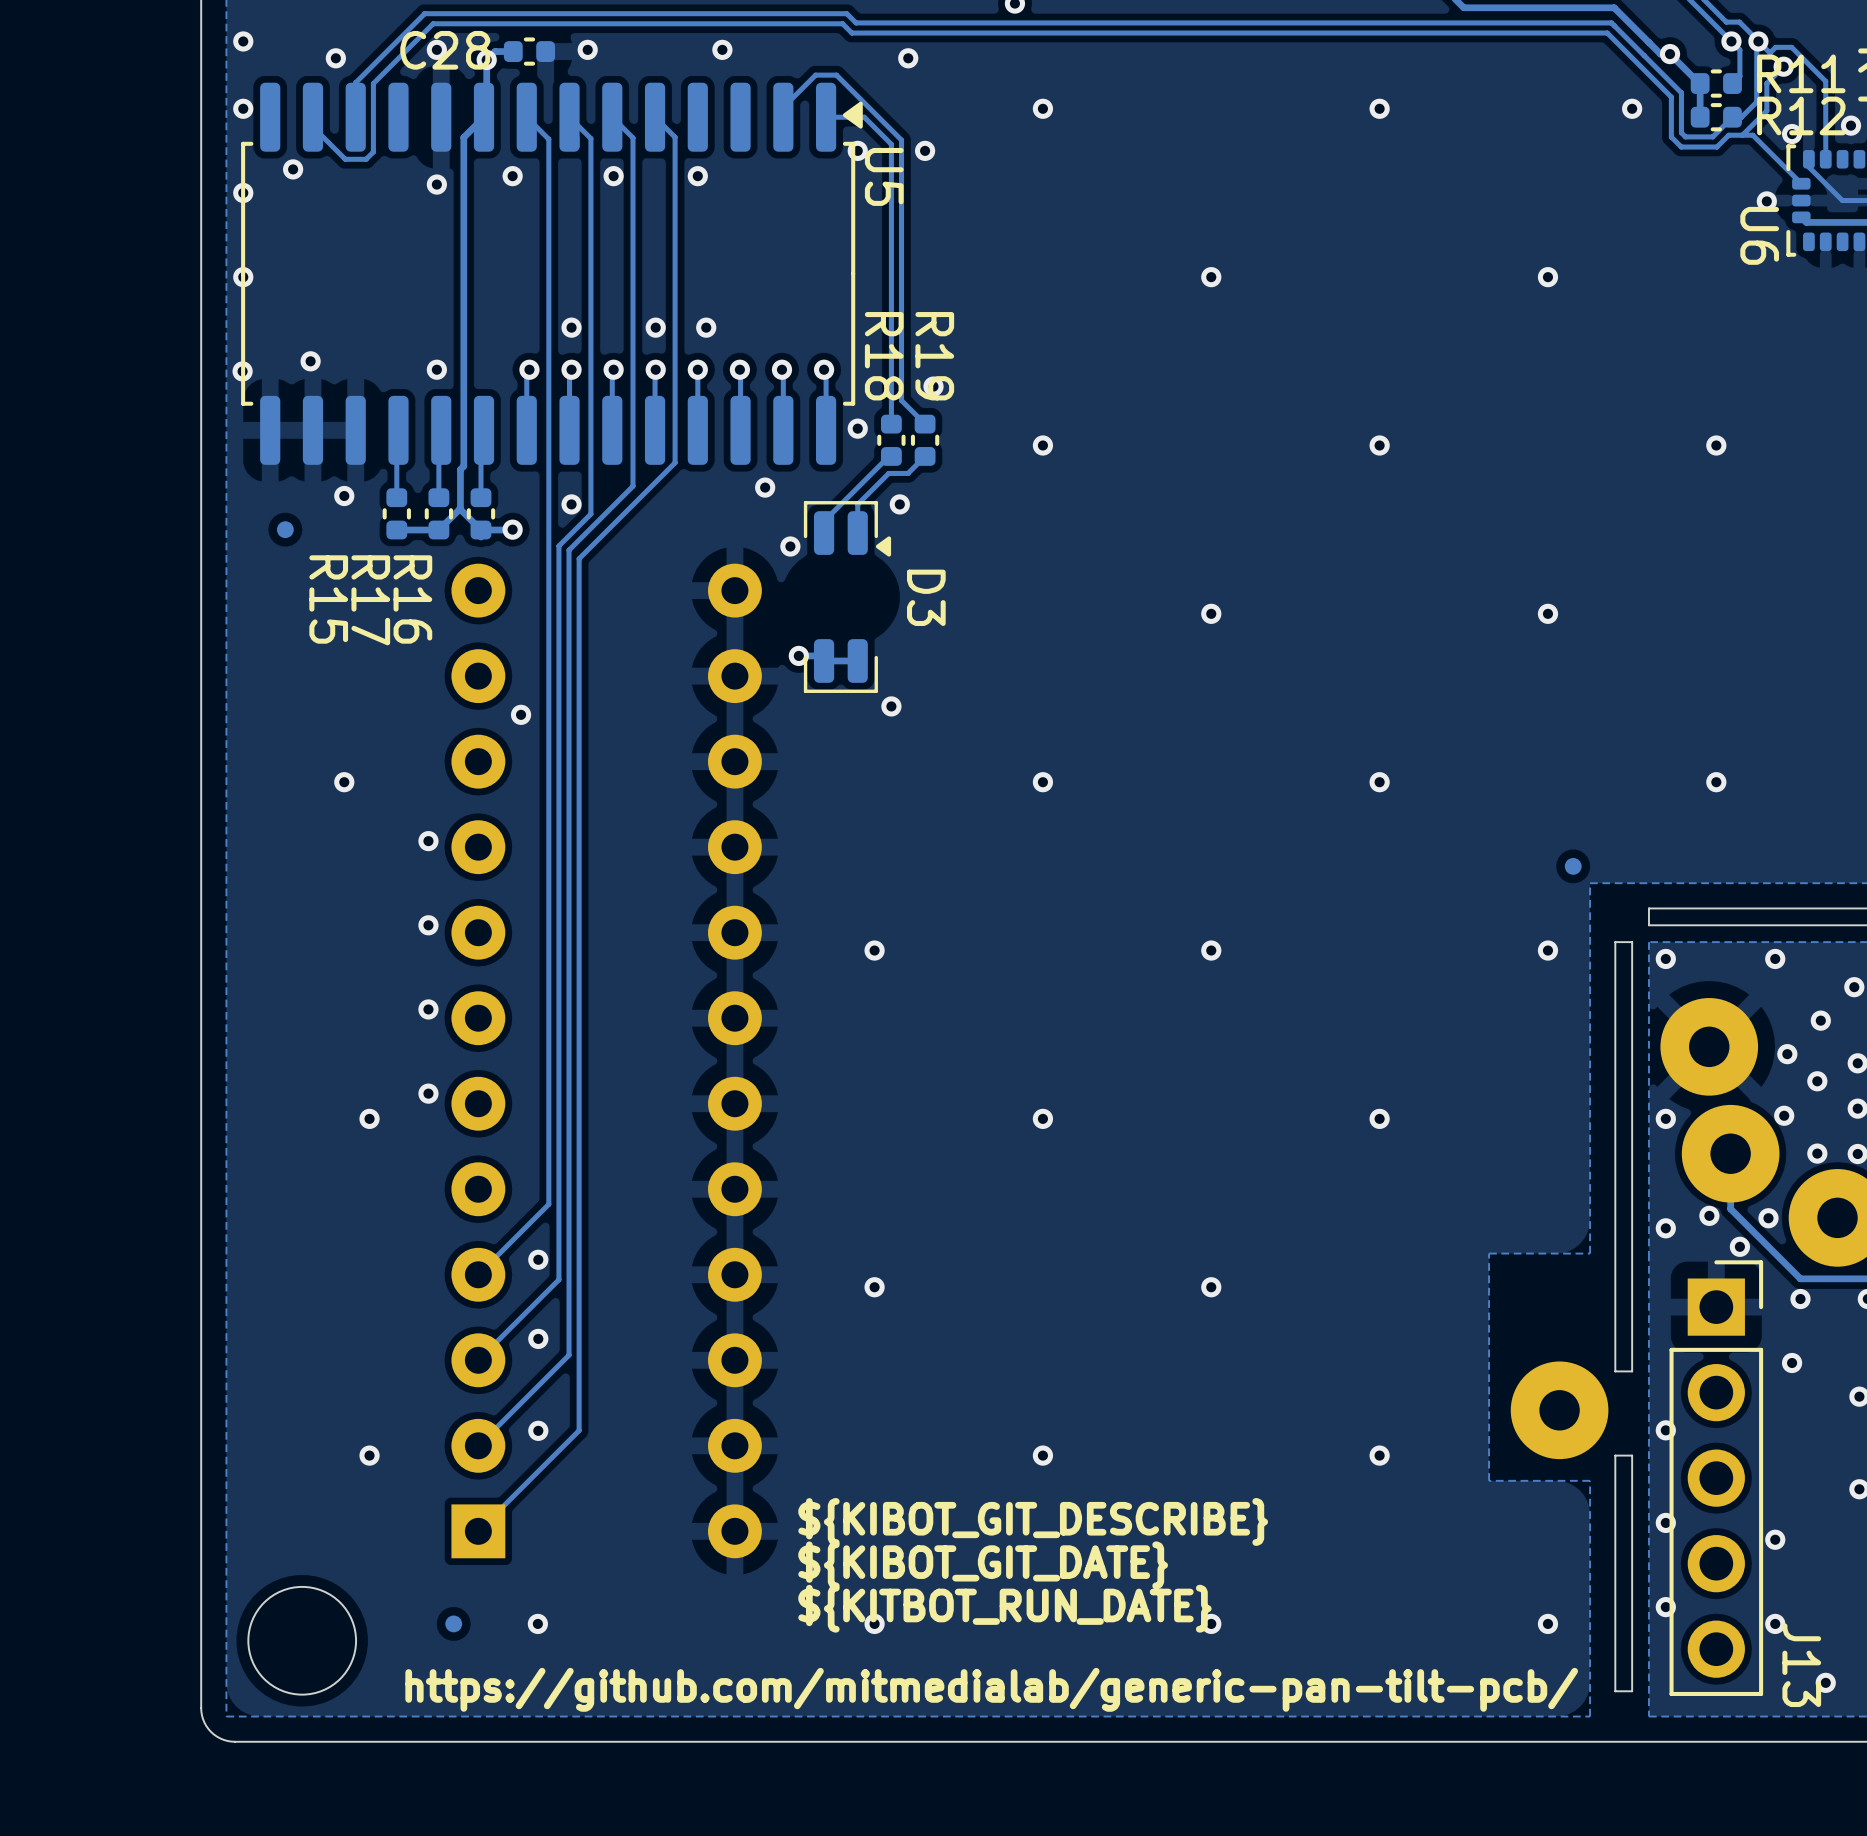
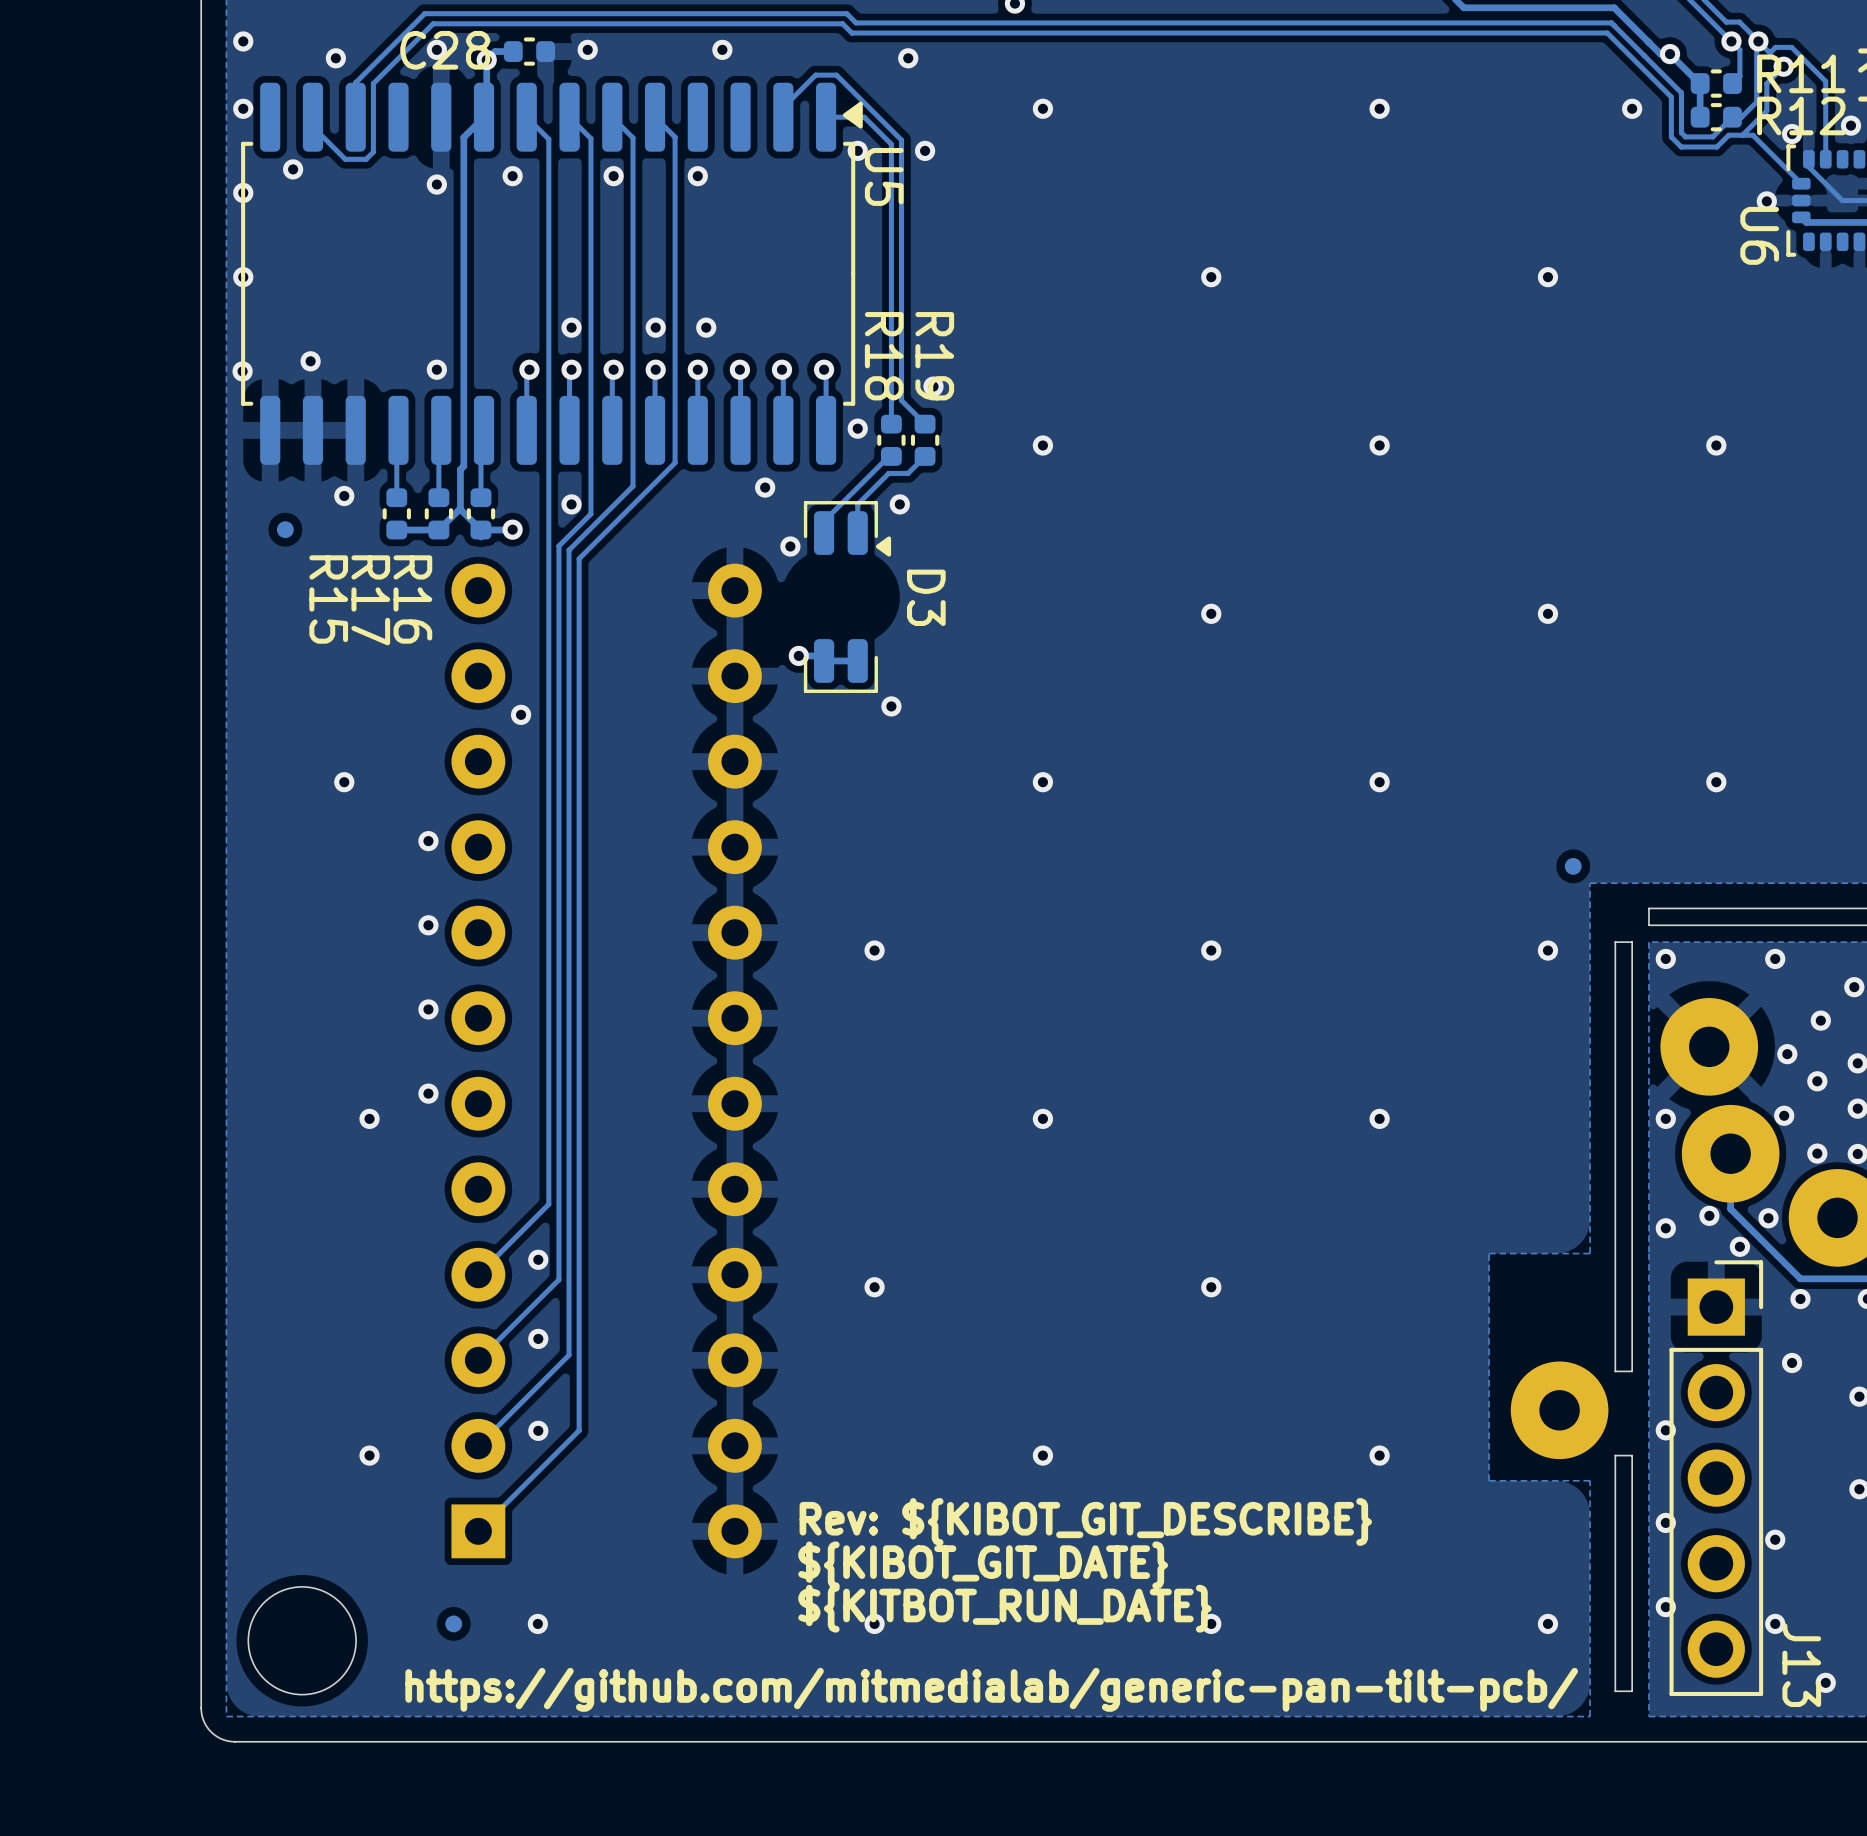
text: ${KIBOT_GIT_DESCRIBE} (1033, 1521) -> Rev: ${KIBOT_GIT_DESCRIBE} (1085, 1521)

